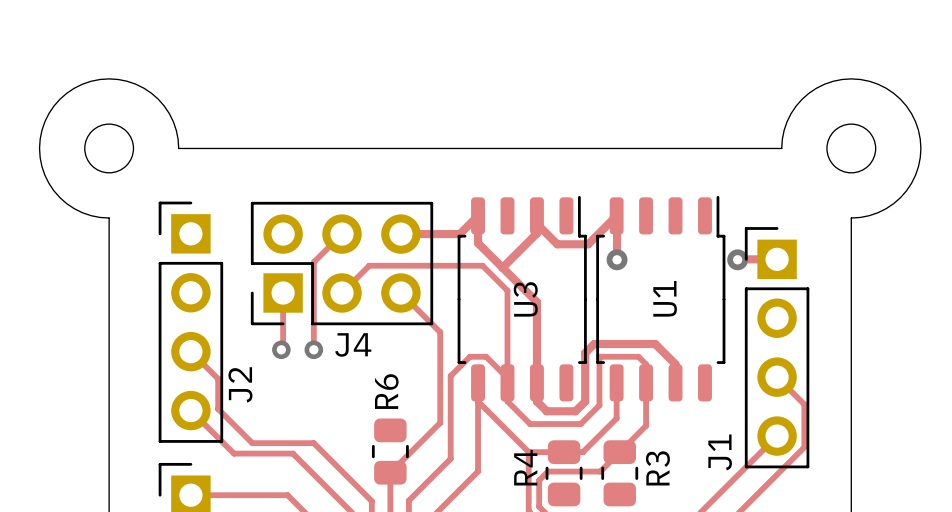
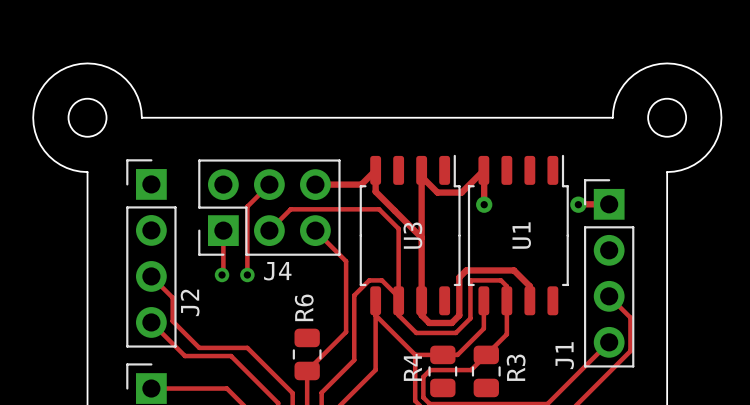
track: (536, 233) (502, 267) -> (421, 184) (421, 237)

